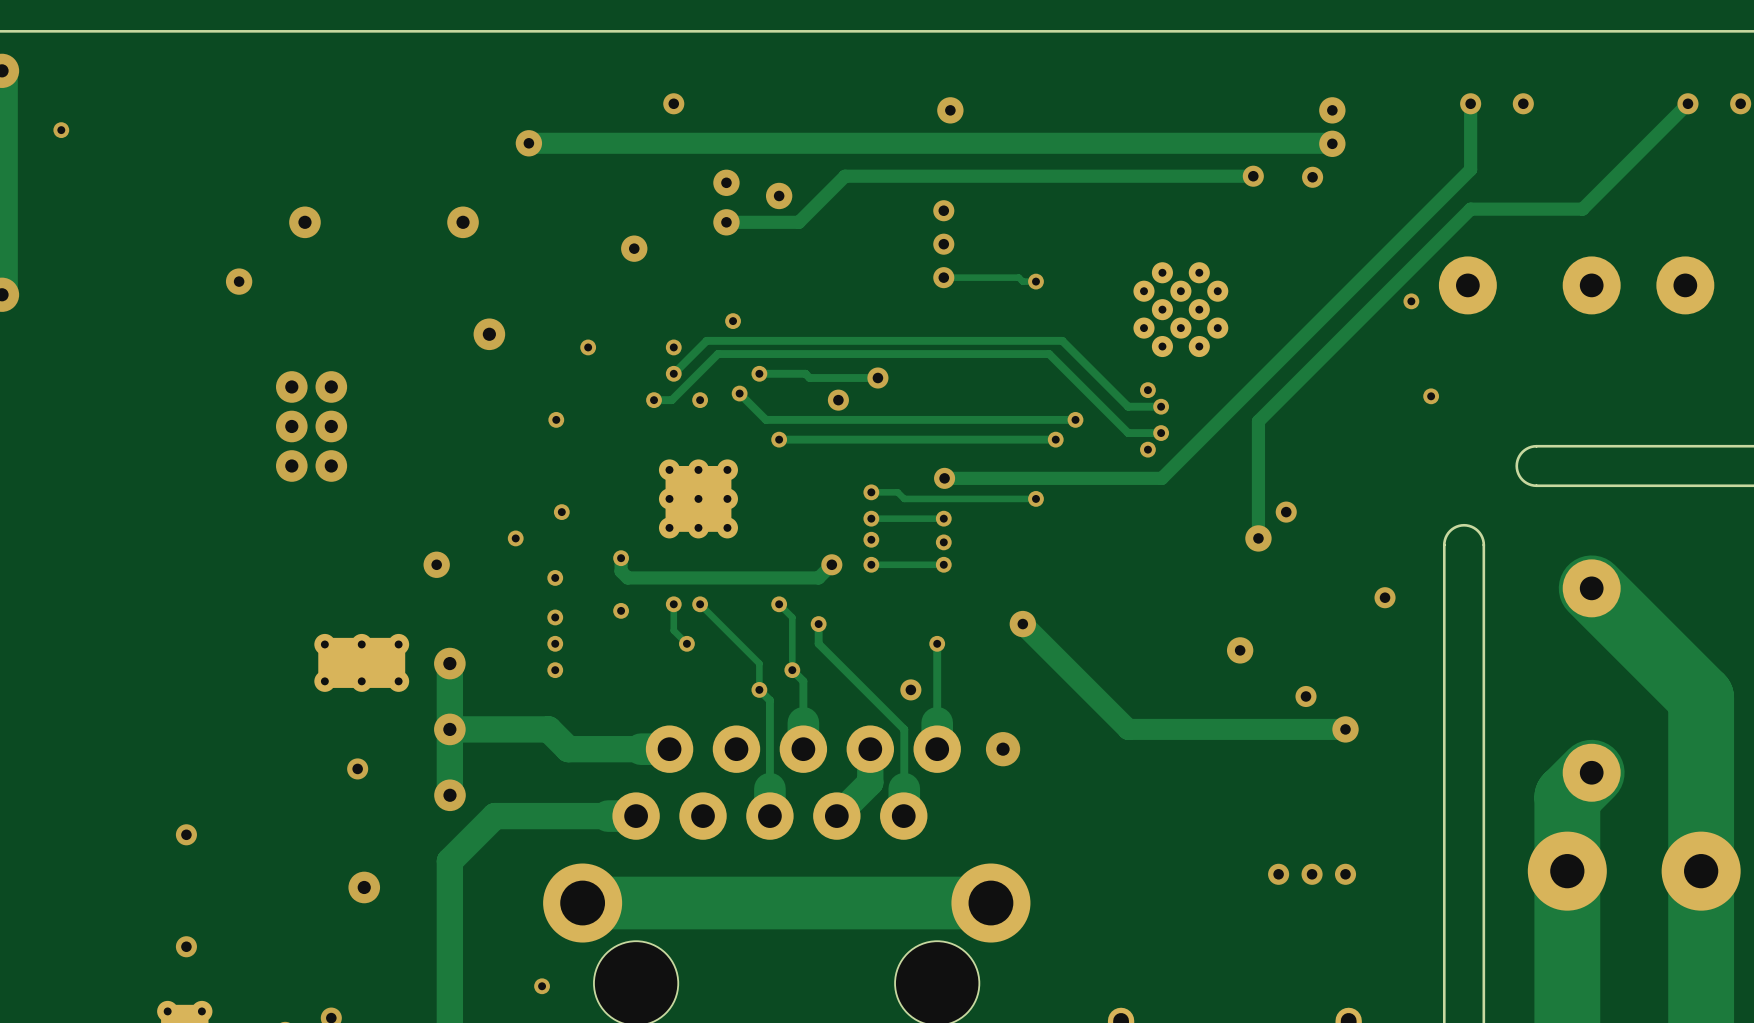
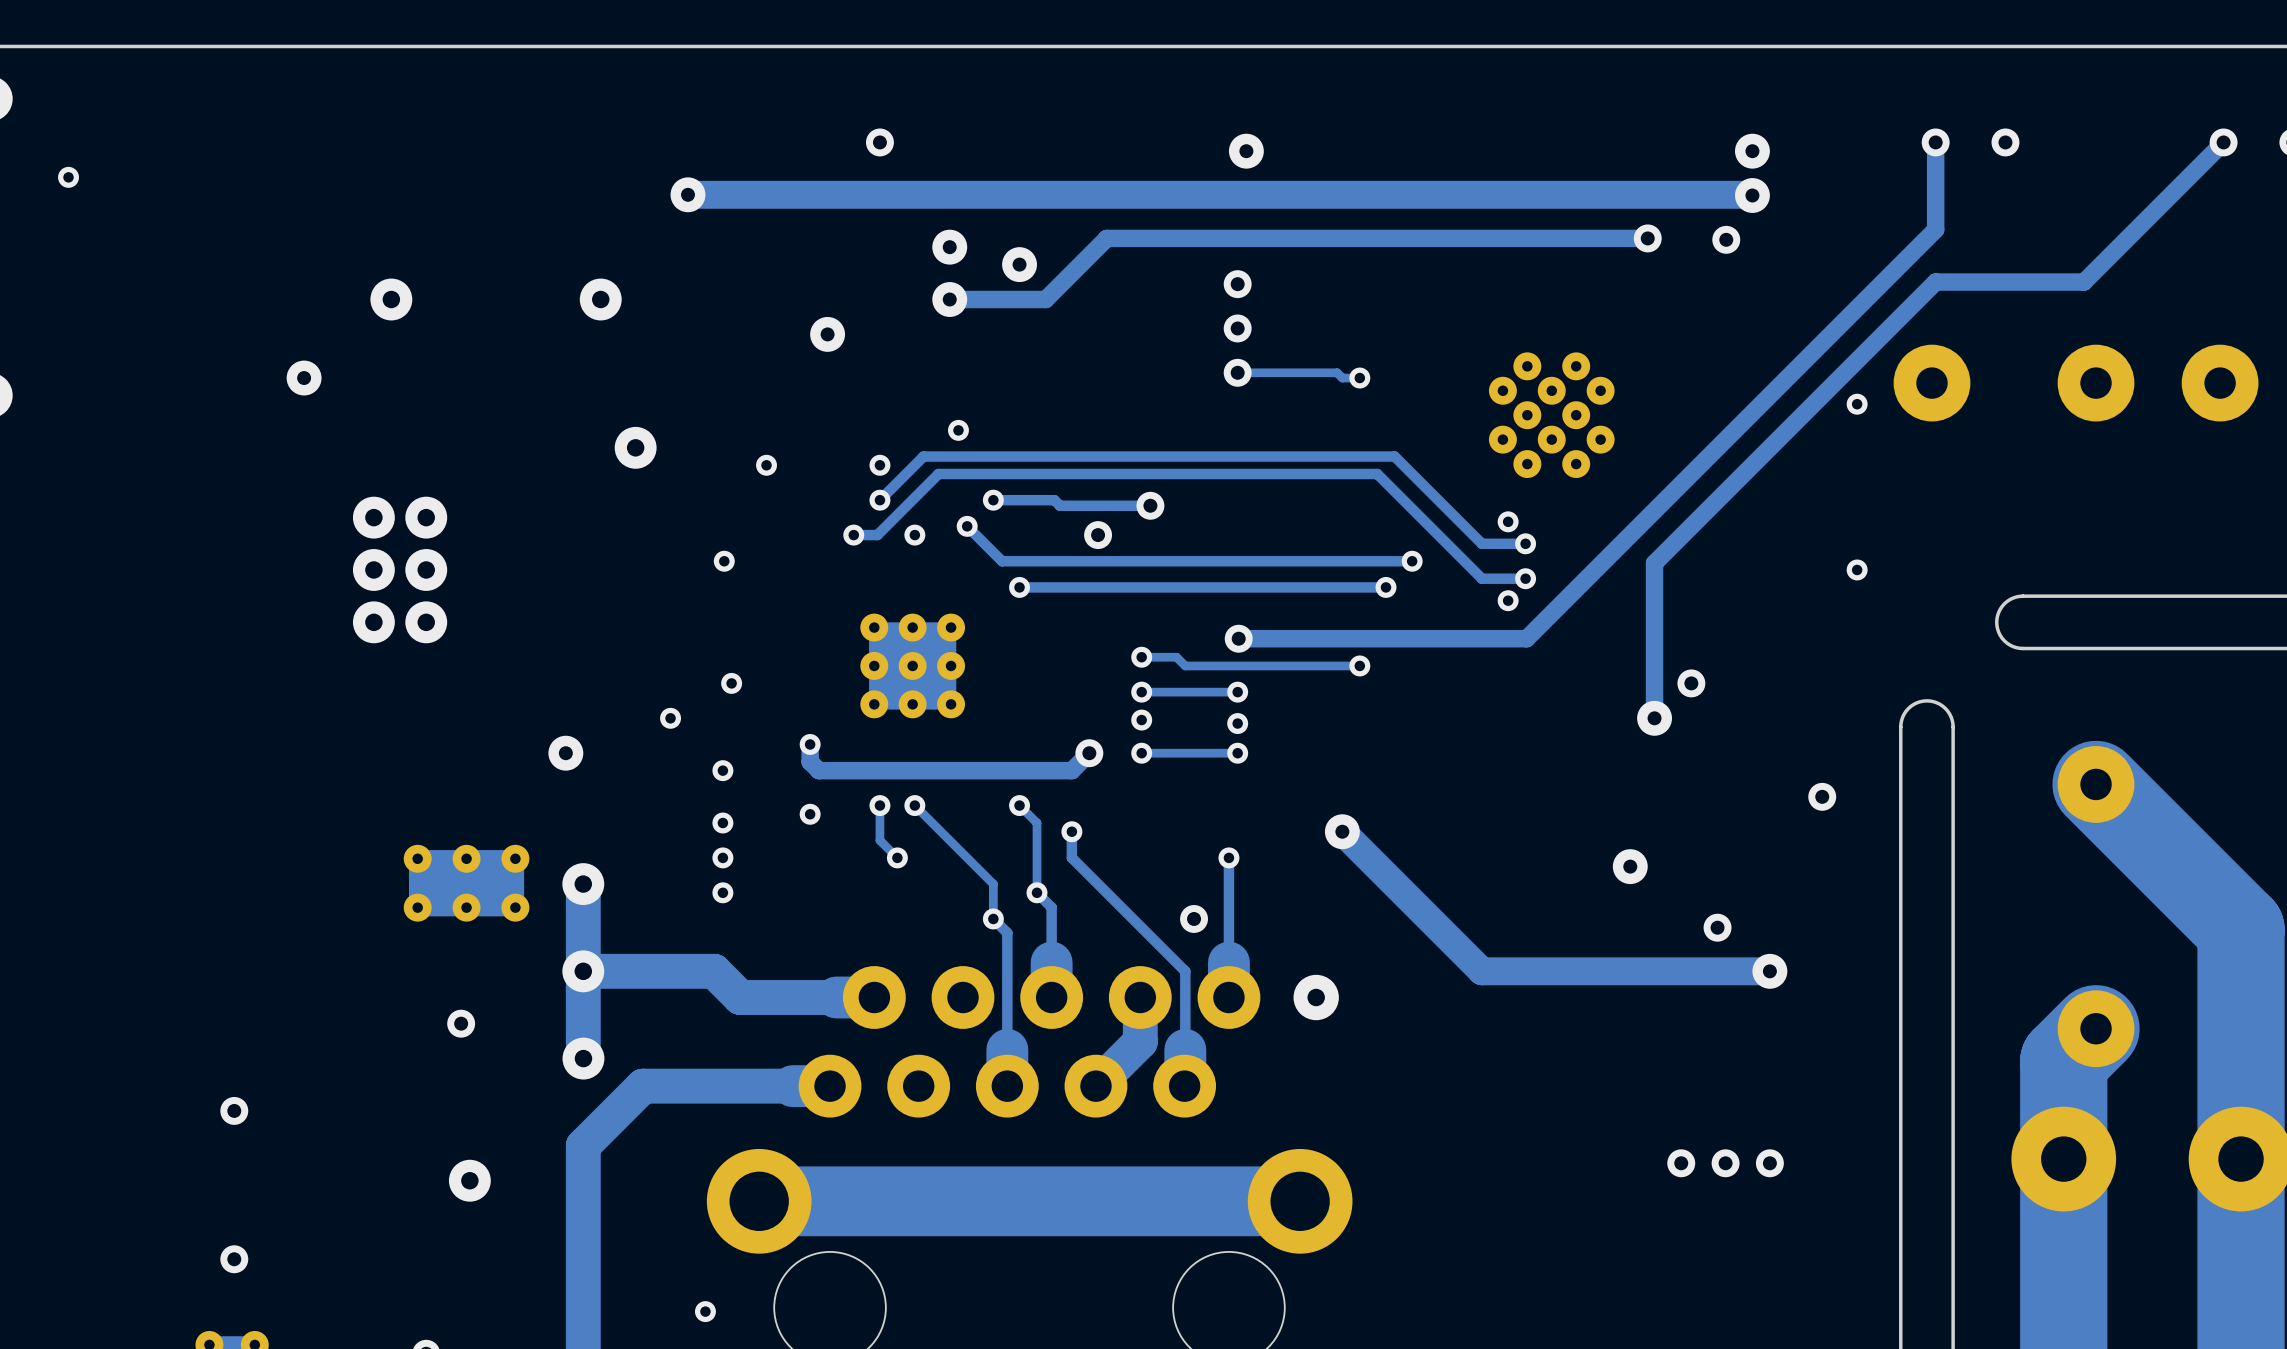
via position: (1431, 396) -> (1857, 569)

